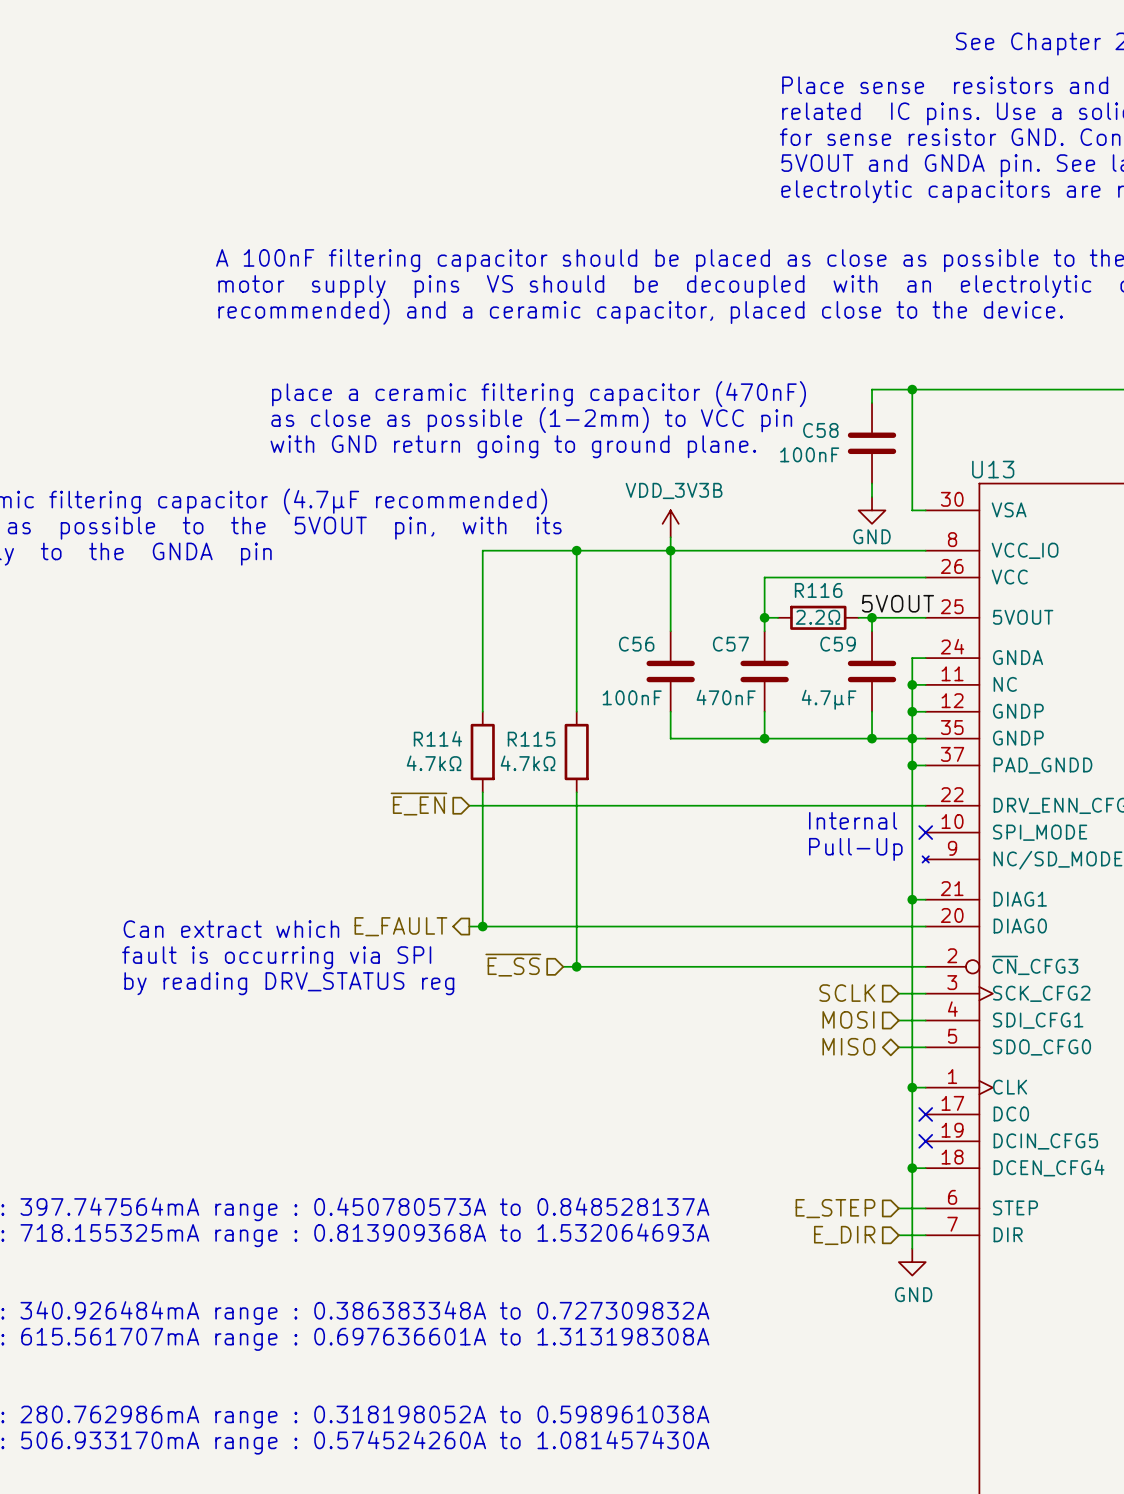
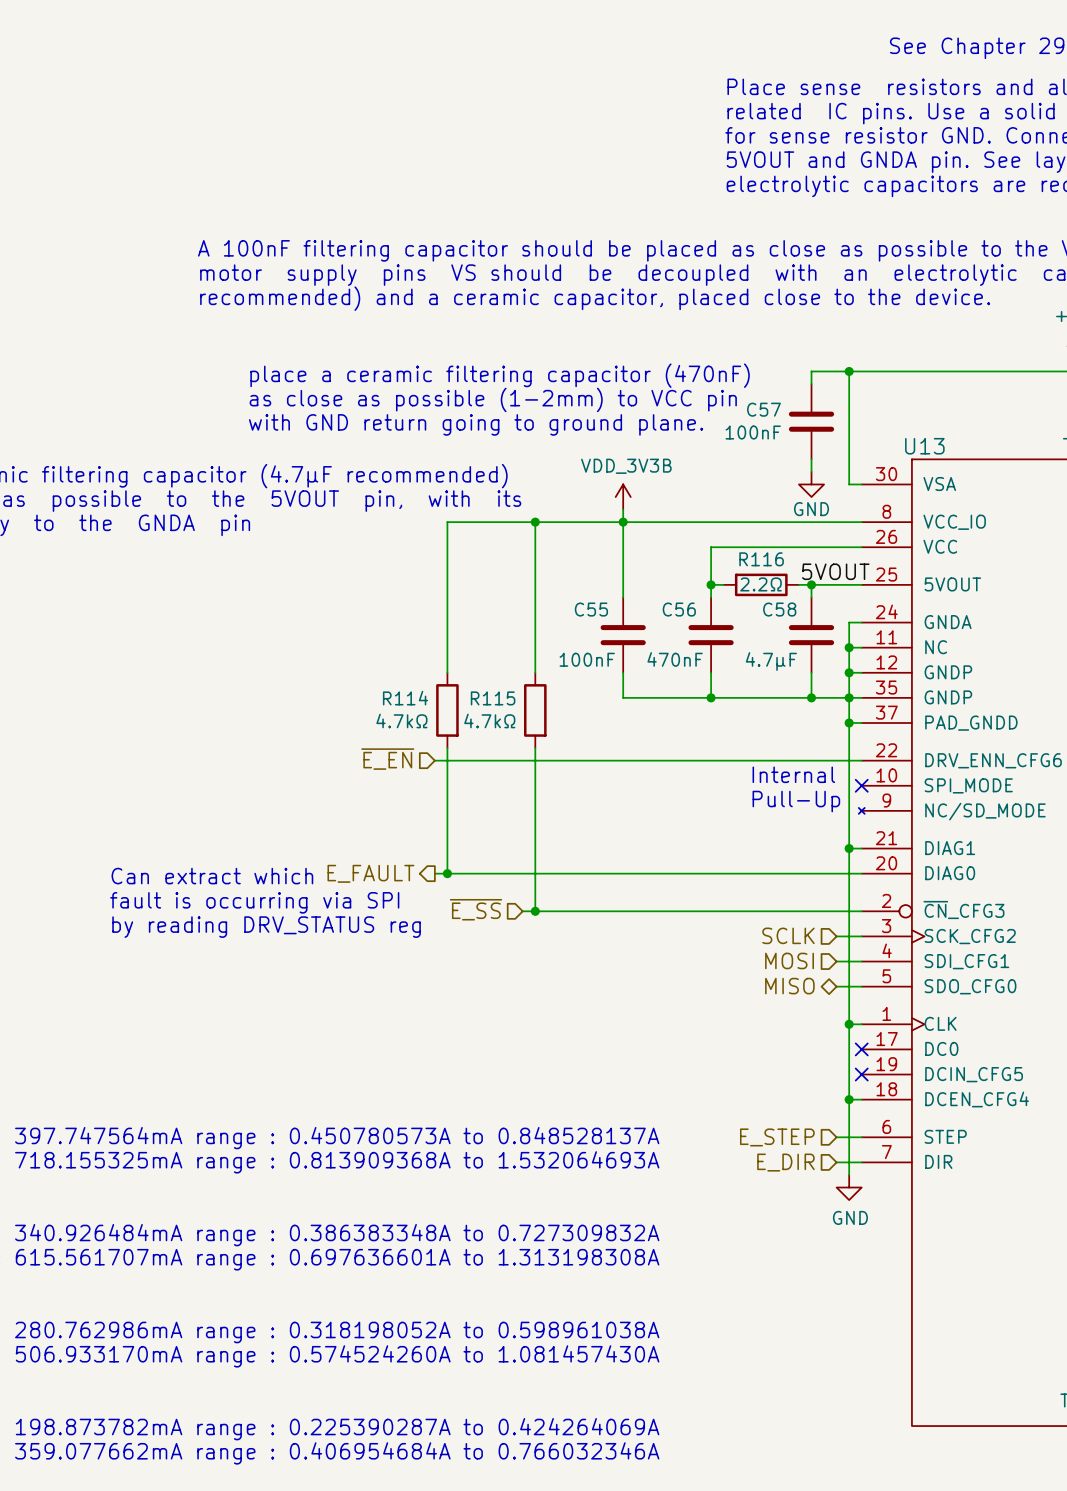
C58 name: C58 (820, 430) -> C57 (763, 409)
C56 name: C56 (636, 644) -> C55 (591, 609)
C57 name: C57 (730, 644) -> C56 (679, 609)
C59 name: C59 (838, 644) -> C58 (779, 609)

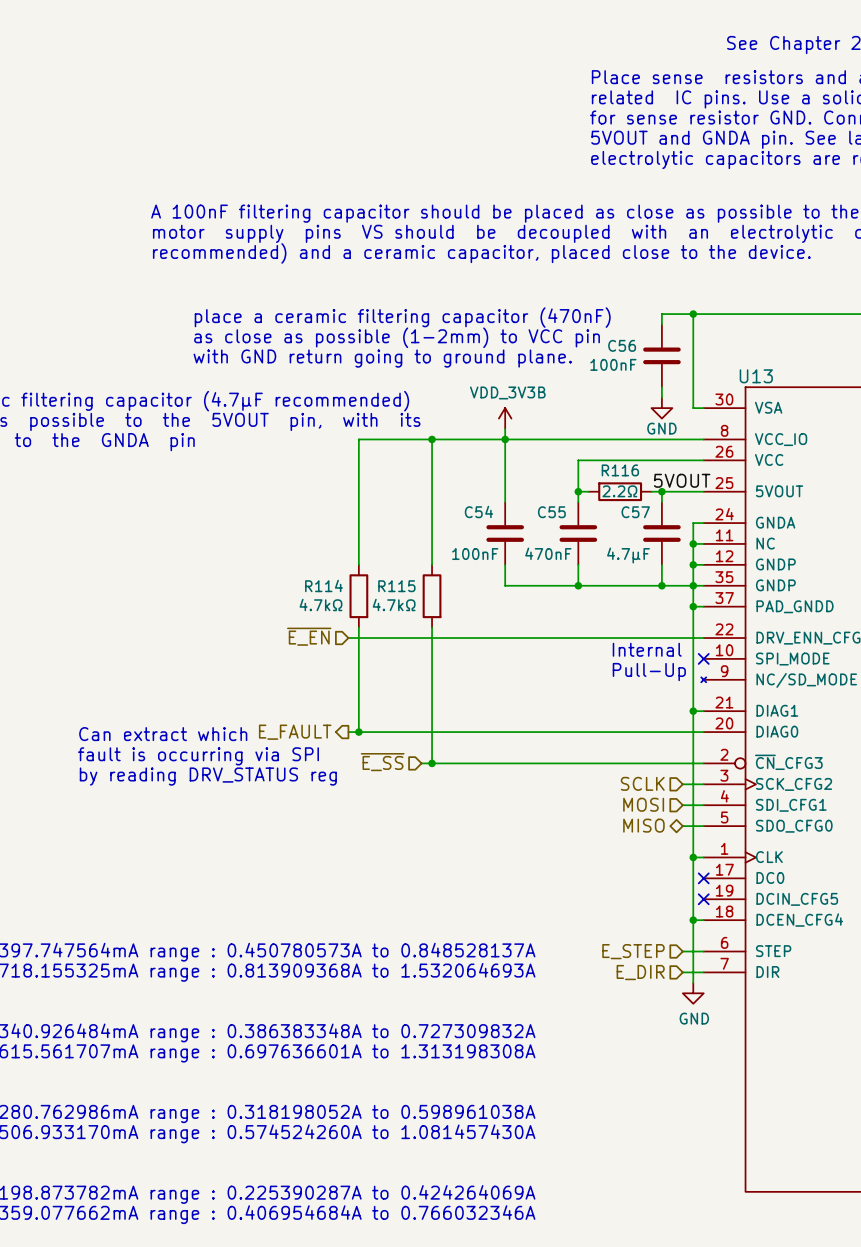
C57 name: C57 (763, 409) -> C56 (622, 345)
C55 name: C55 (591, 609) -> C54 (478, 511)
C56 name: C56 (679, 609) -> C55 (551, 512)
C58 name: C58 (779, 609) -> C57 (635, 512)

